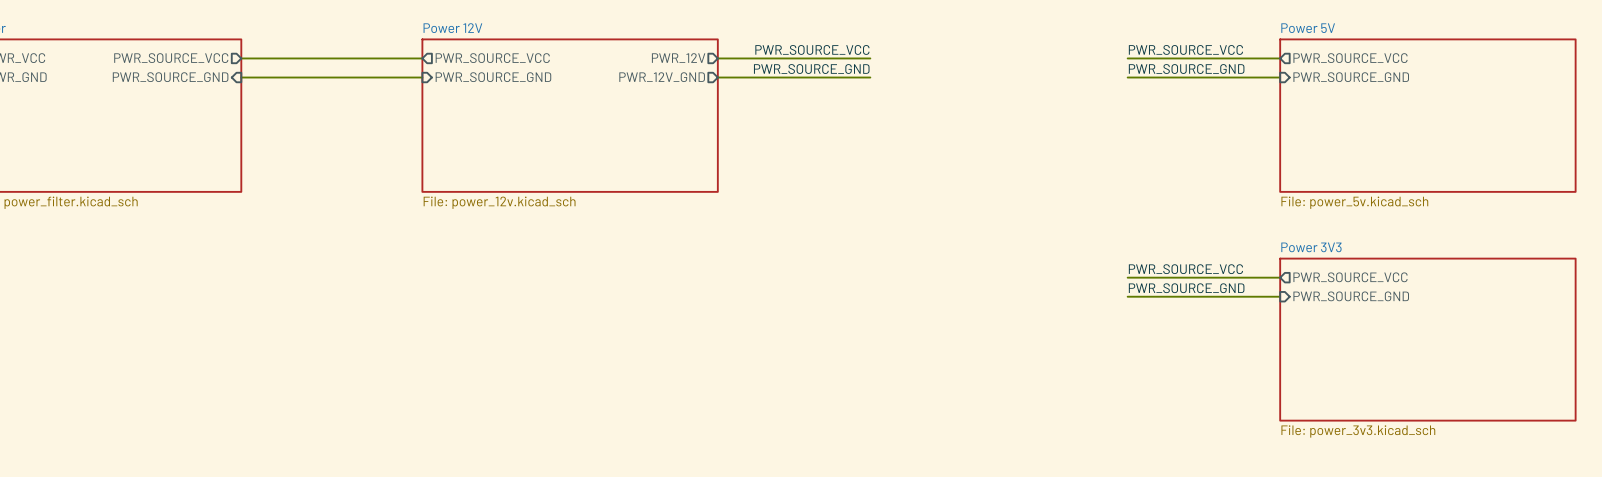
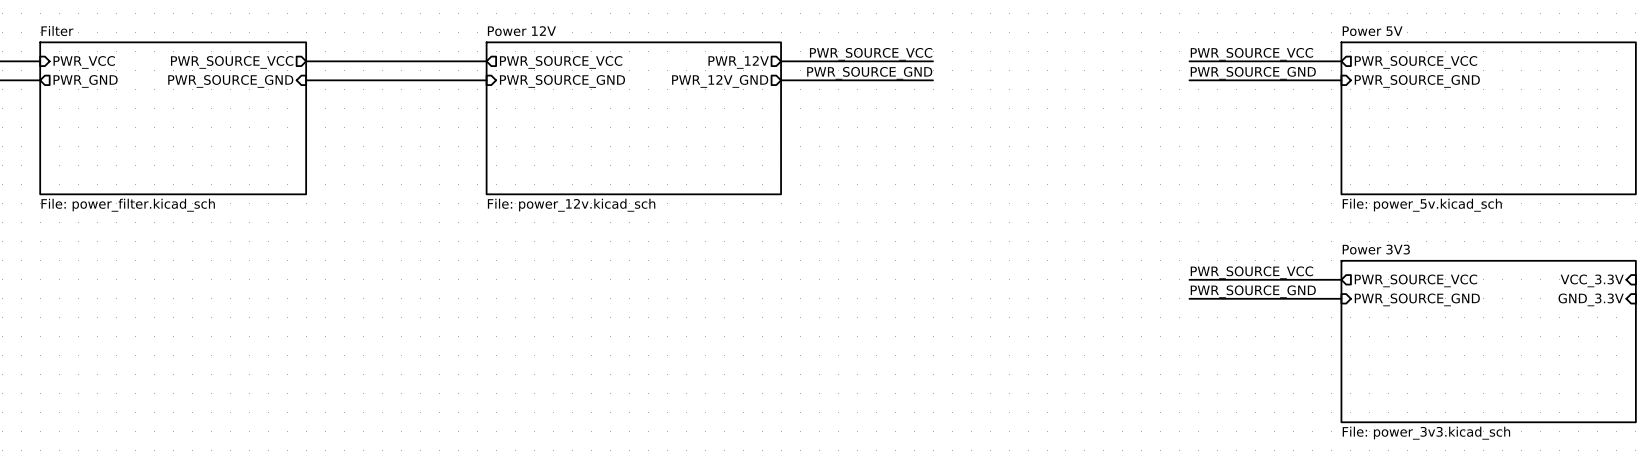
sheet pin: none -> VCC_3.3V (1592, 280)
sheet pin: none -> GND_3.3V (1591, 299)

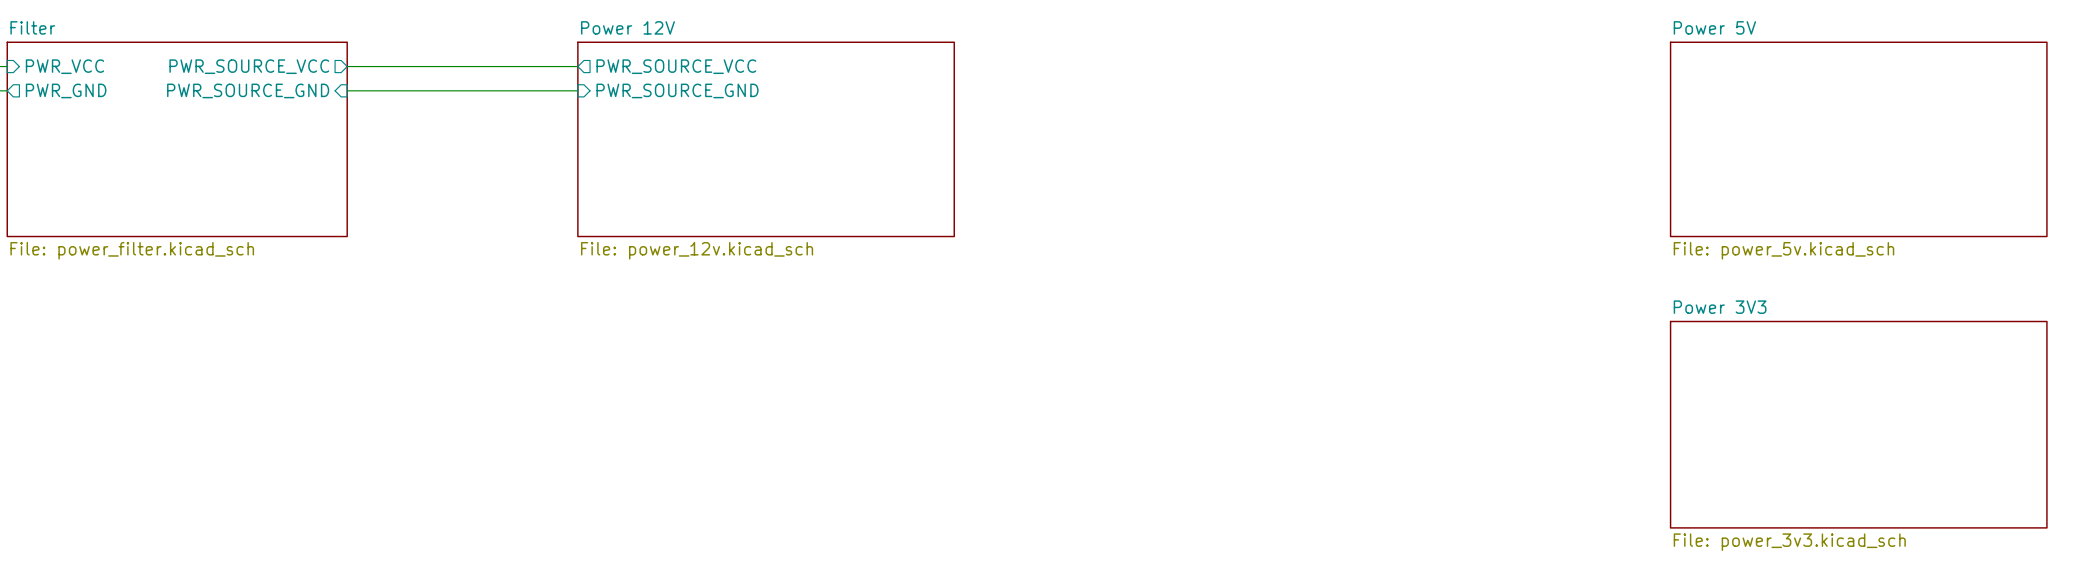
label: PWR_SOURCE_VCC (871, 54) -> none
label: PWR_SOURCE_VCC (1251, 54) -> none
wire: (781, 61) (933, 61) -> none
wire: (1189, 61) (1341, 61) -> none
sheet pin: PWR_12V (738, 62) -> none
sheet pin: PWR_SOURCE_VCC (1415, 62) -> none
label: PWR_SOURCE_GND (869, 73) -> none
label: PWR_SOURCE_GND (1253, 73) -> none
wire: (781, 80) (933, 80) -> none
wire: (1189, 80) (1341, 80) -> none
sheet pin: PWR_12V_GND (720, 81) -> none
sheet pin: PWR_SOURCE_GND (1417, 81) -> none
label: PWR_SOURCE_VCC (1251, 272) -> none
wire: (1189, 279) (1341, 279) -> none
sheet pin: PWR_SOURCE_VCC (1415, 280) -> none
sheet pin: VCC_3.3V (1592, 280) -> none
label: PWR_SOURCE_GND (1253, 291) -> none
wire: (1189, 298) (1341, 298) -> none
sheet pin: PWR_SOURCE_GND (1417, 299) -> none
sheet pin: GND_3.3V (1591, 299) -> none

